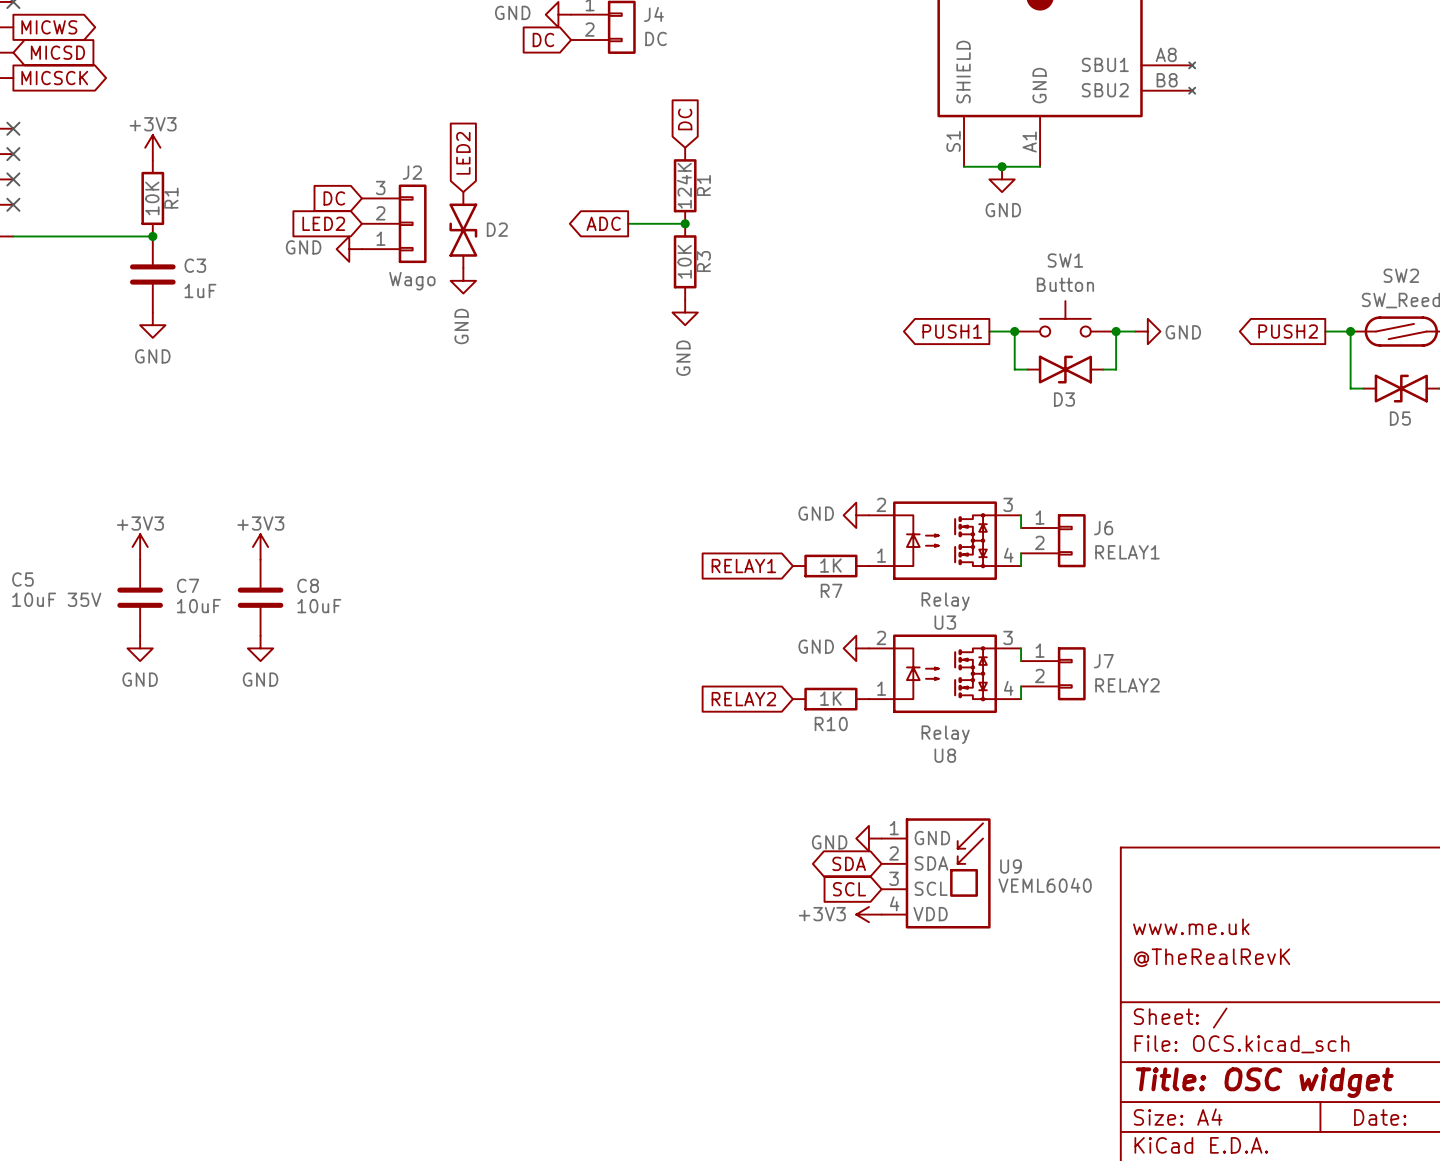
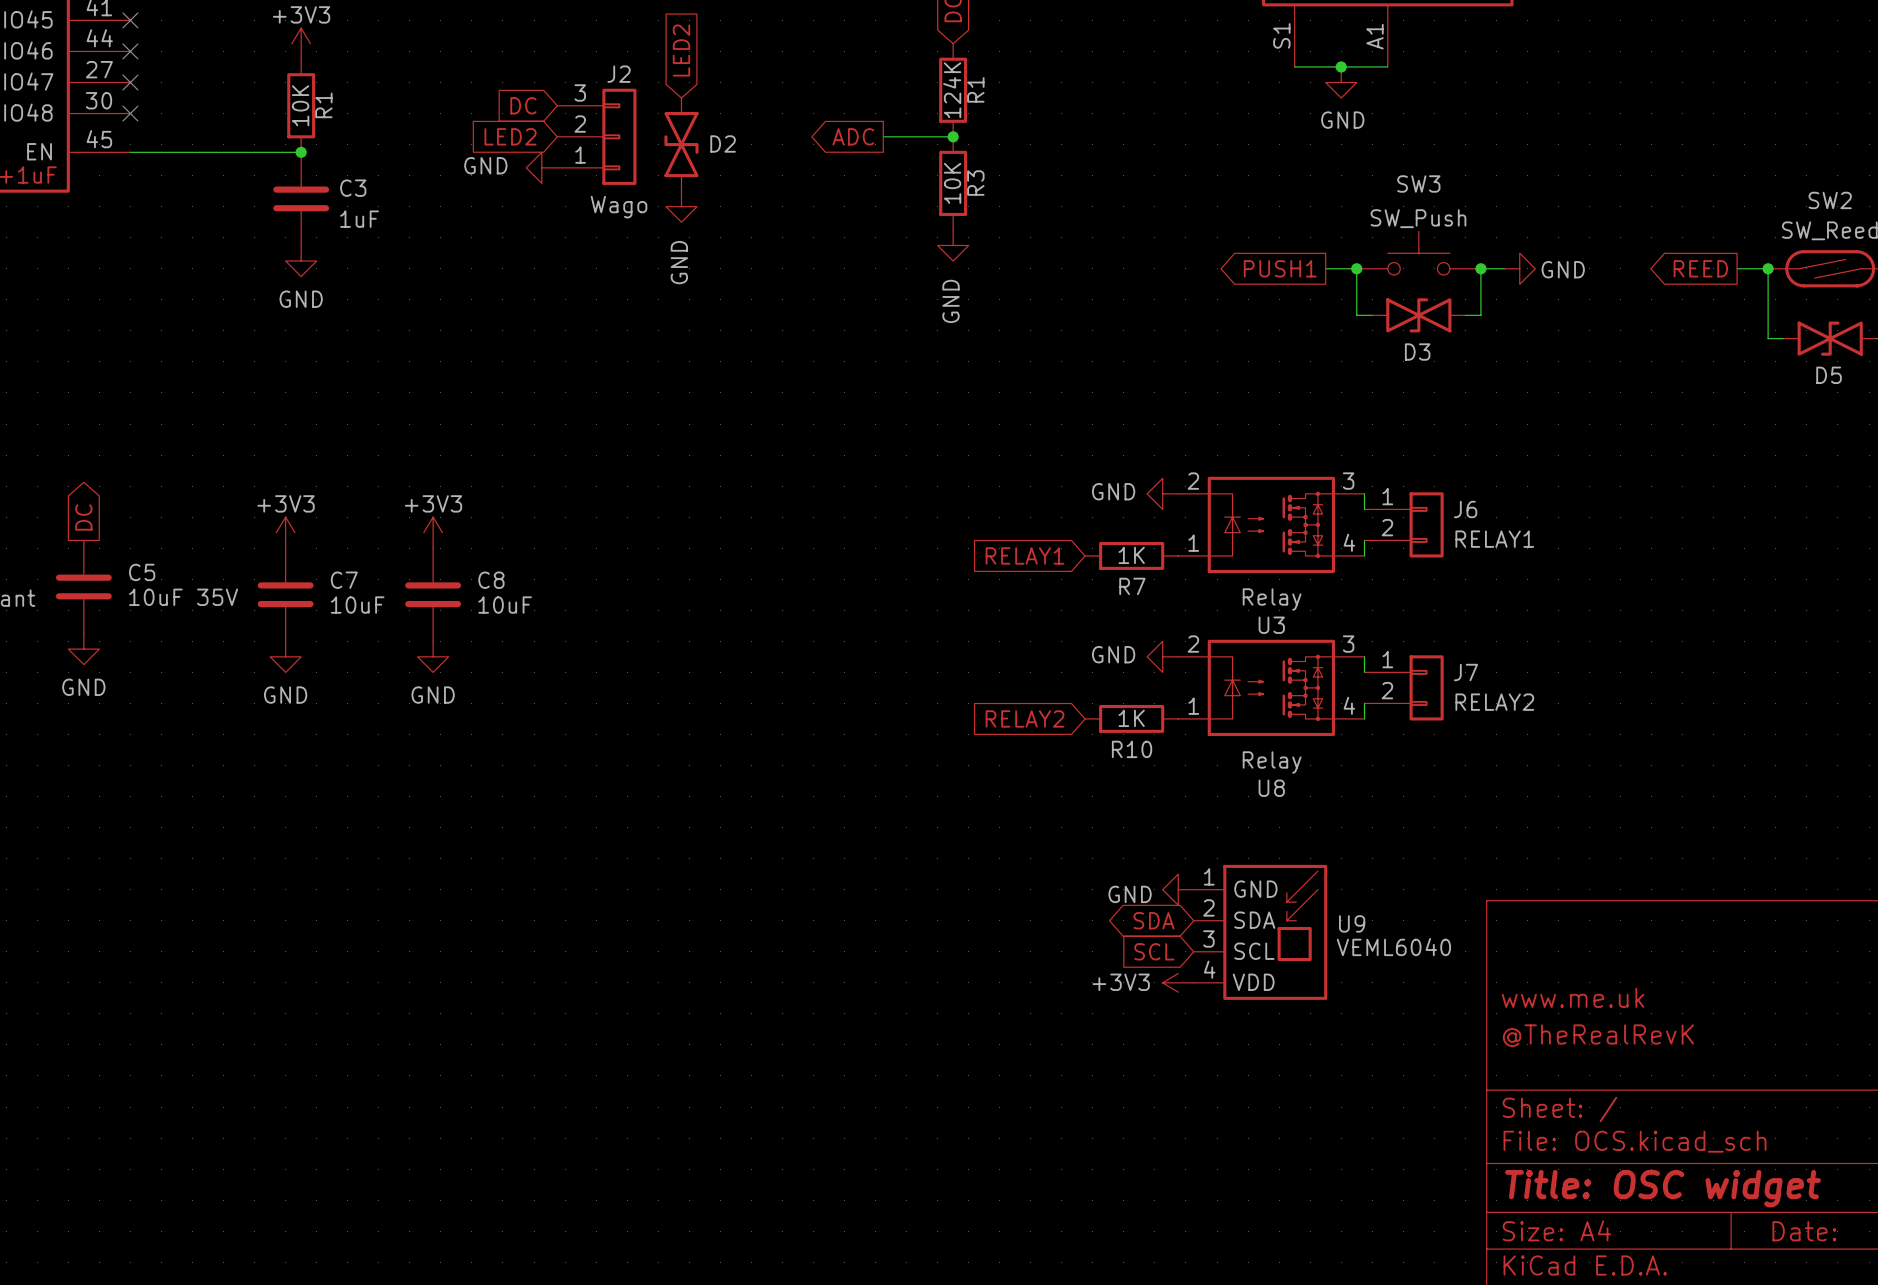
SW1 name: SW1 (1065, 260) -> SW3 (1418, 184)
SW1 value: Button (1065, 284) -> SW_Push (1418, 218)
global label: PUSH2 (1288, 331) -> REED (1700, 268)

